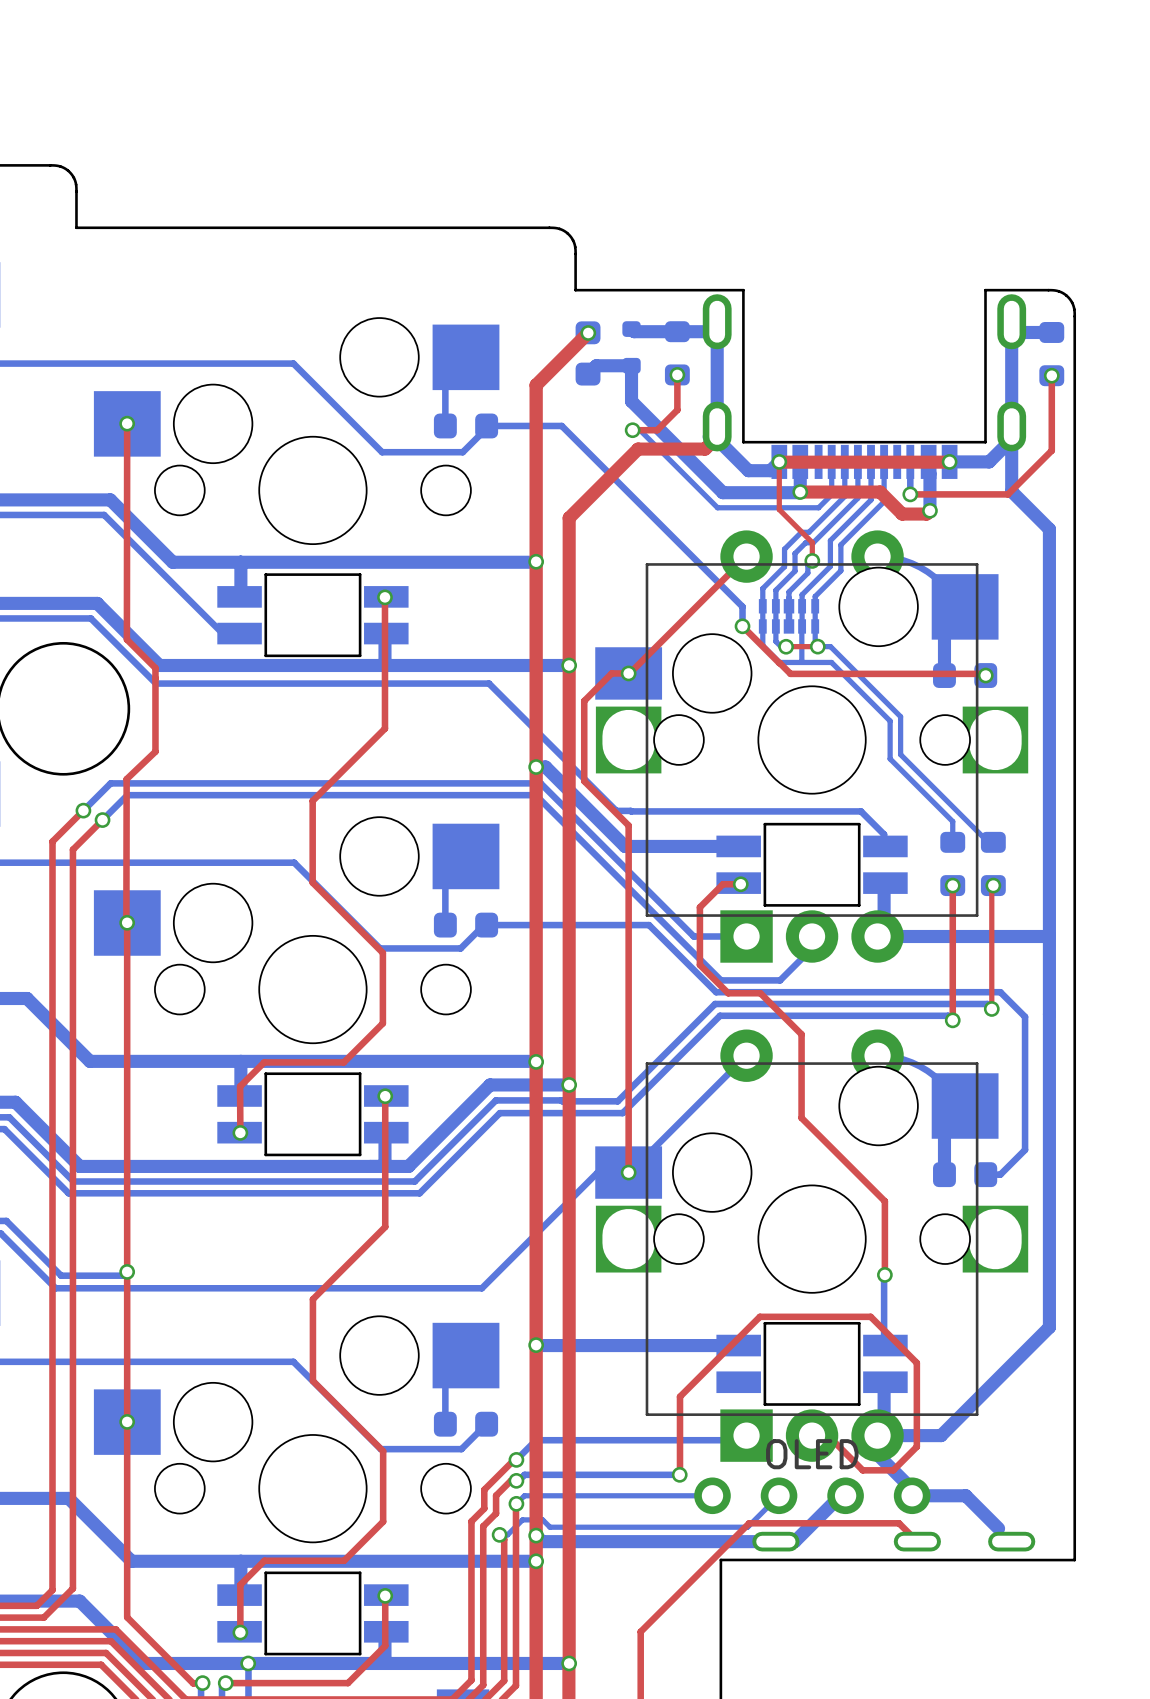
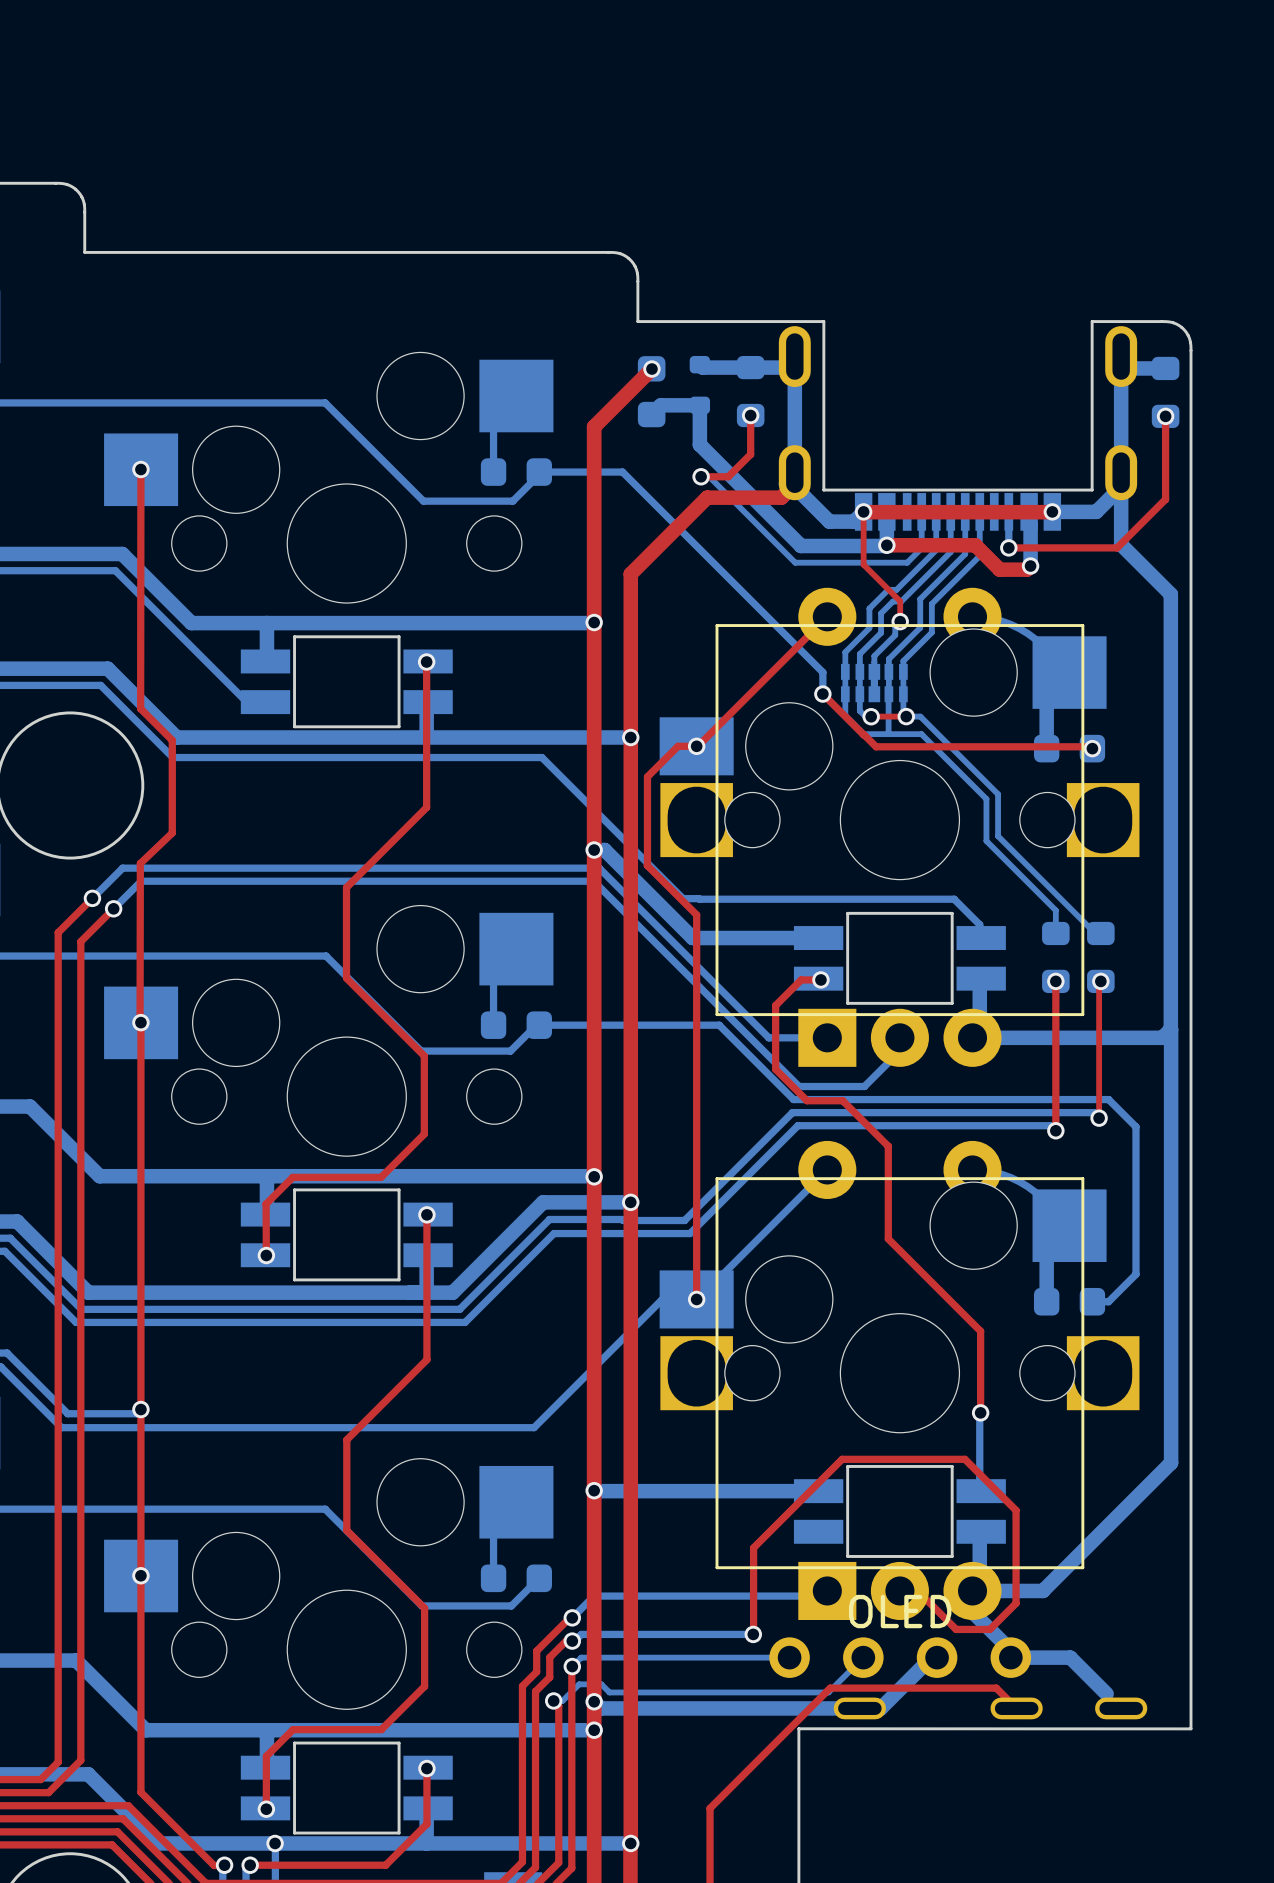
bottom track: (1049, 529) (1049, 1327) -> (1162, 586) (1170, 594) (1170, 1029) (1162, 1037)
bottom track: none -> (1171, 1029) (1171, 1462) (1162, 1470)

